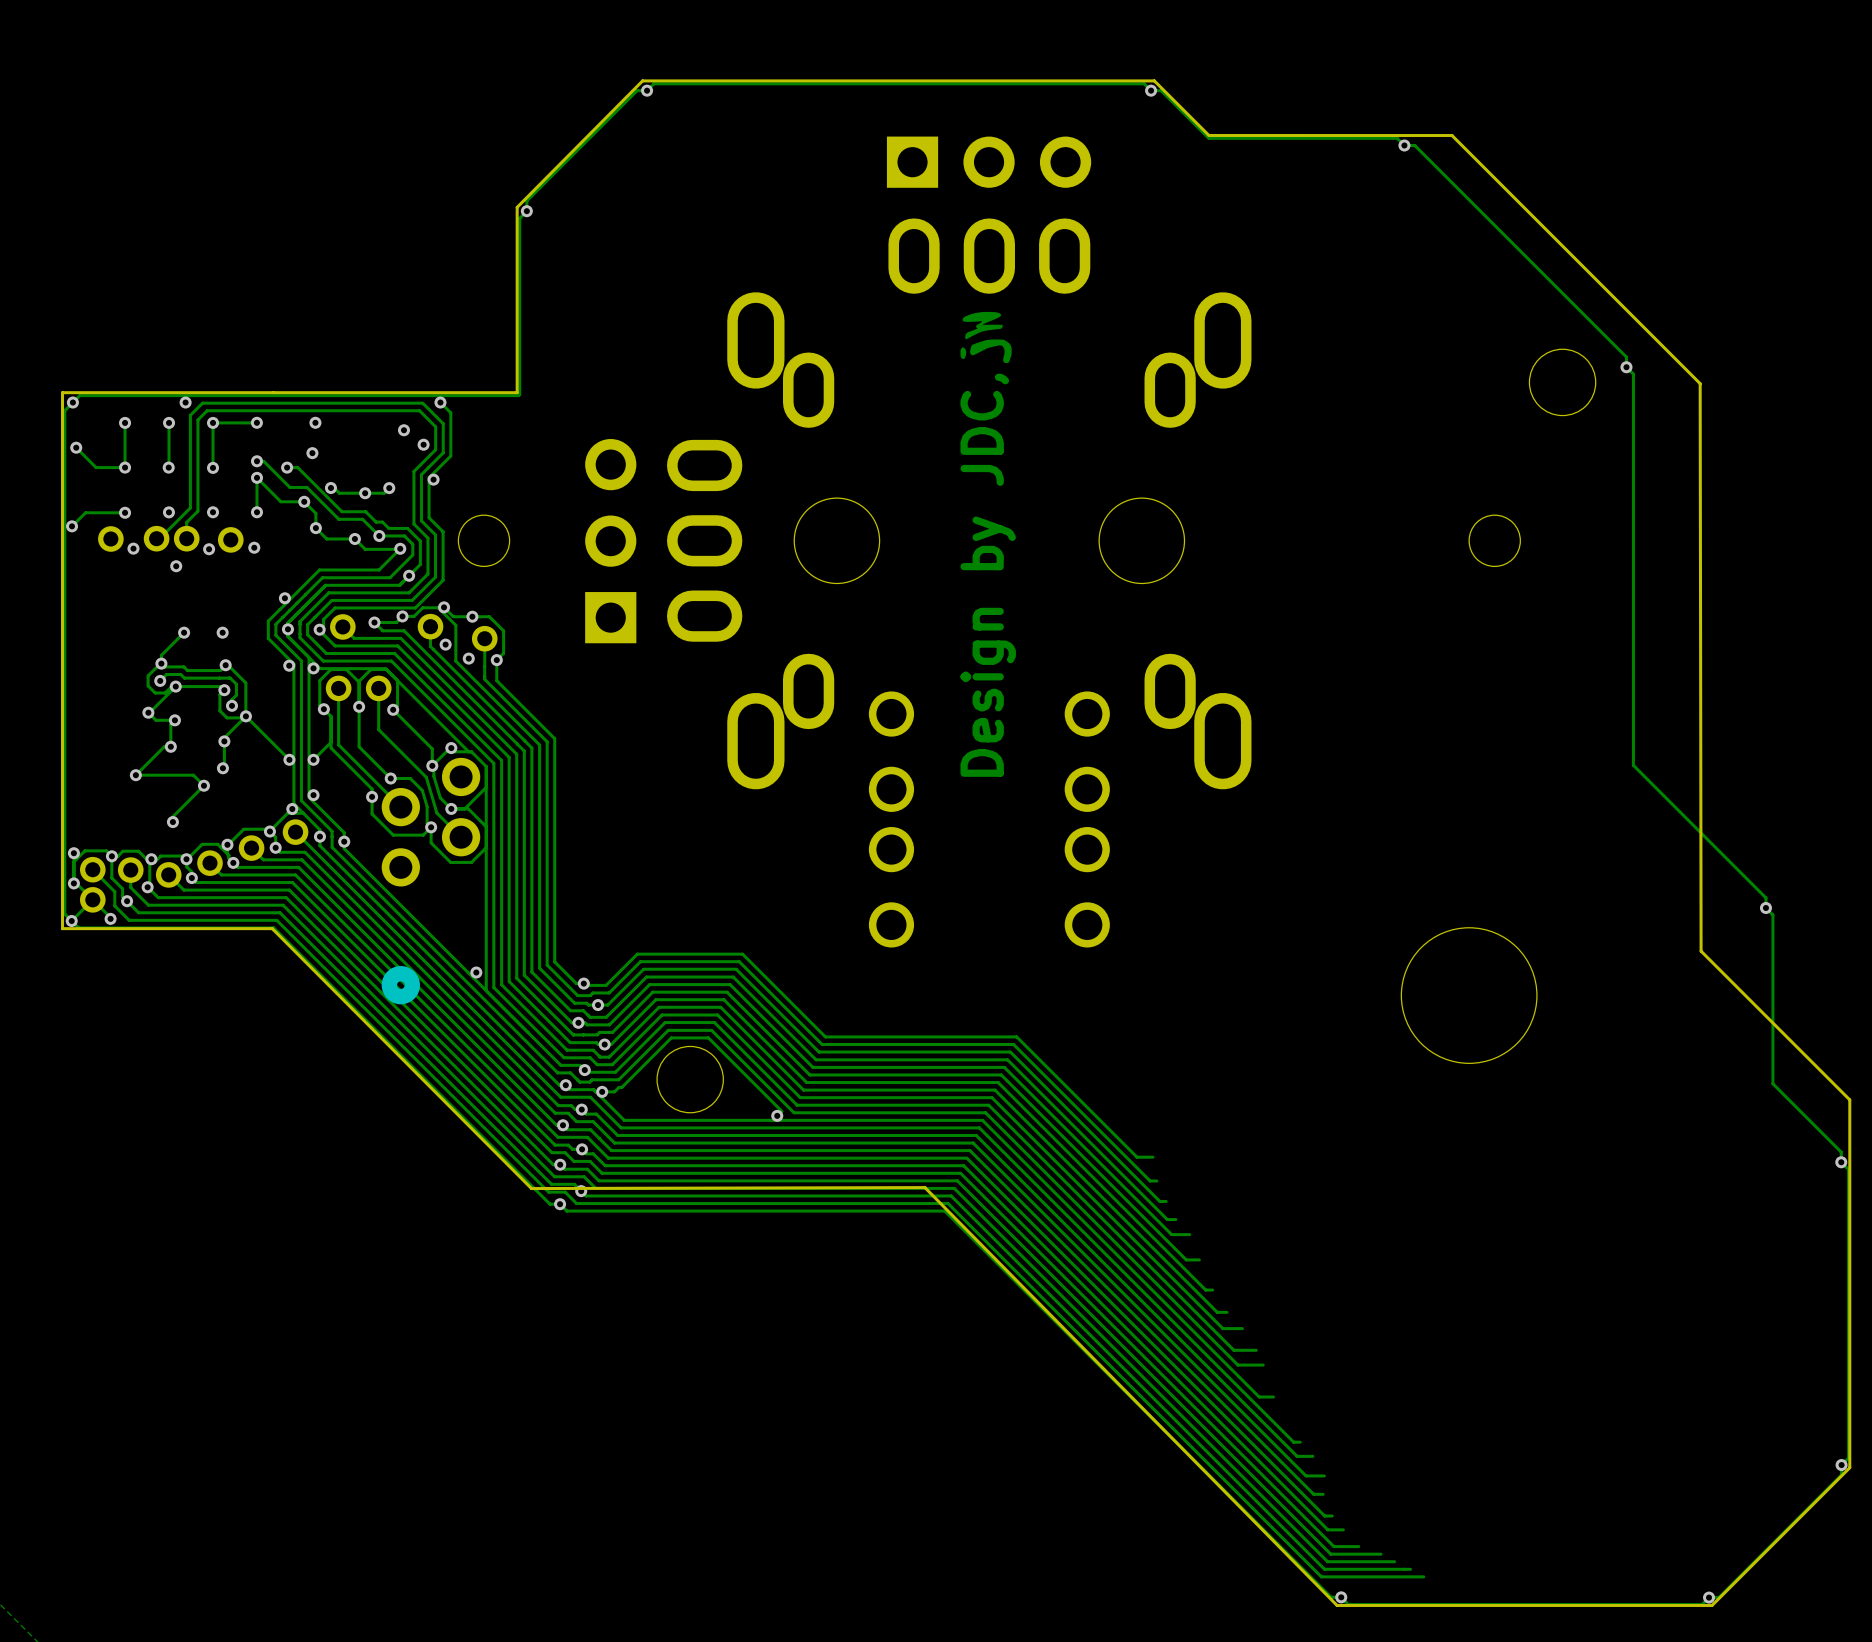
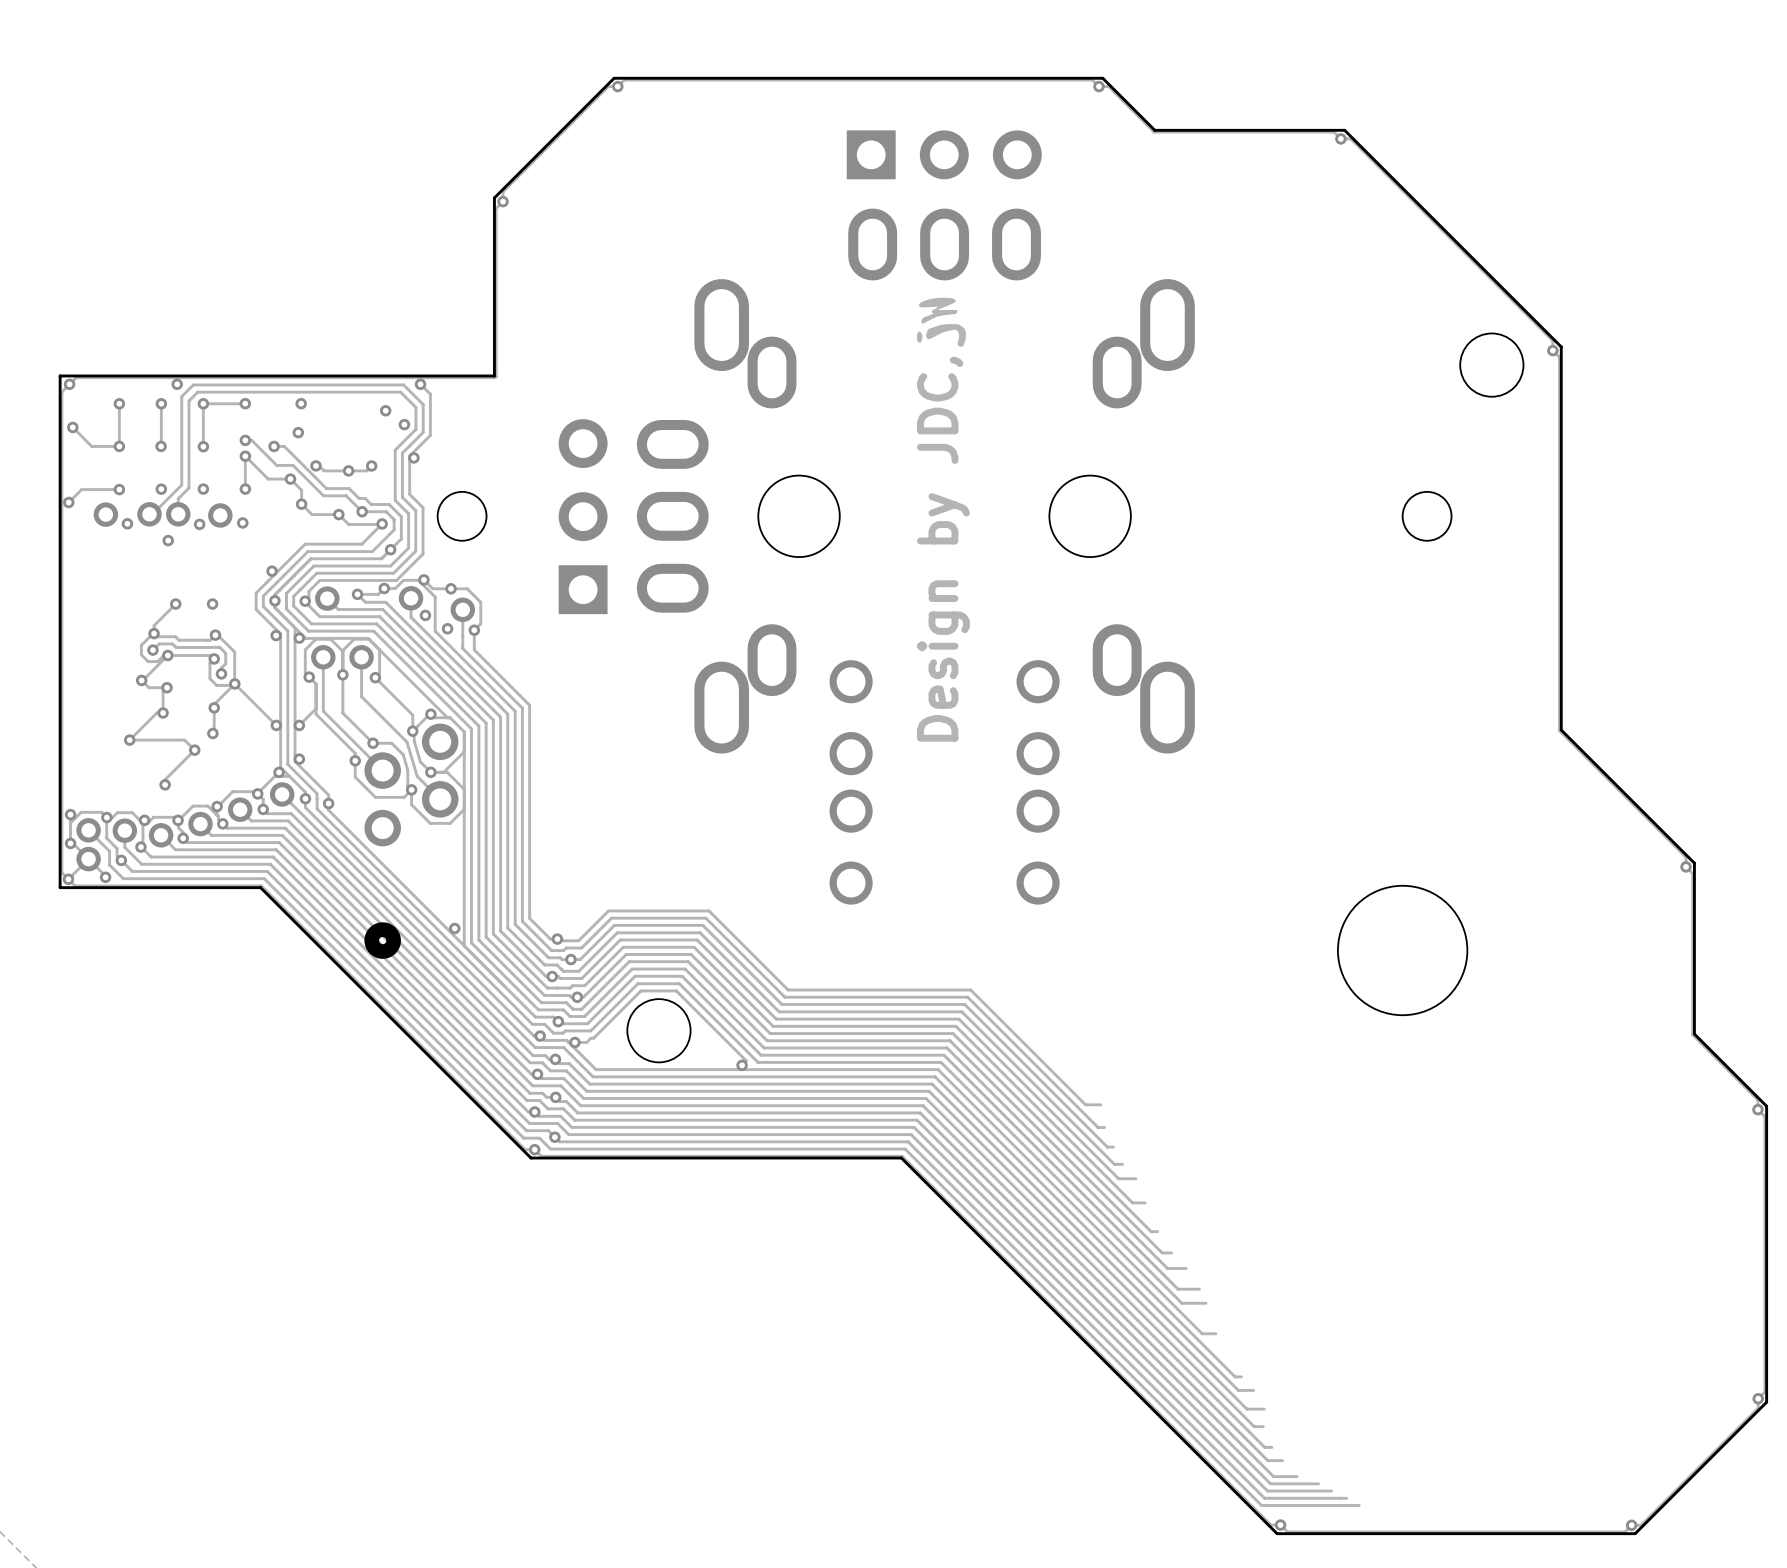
board edge: (1154, 80) (642, 80) (517, 207) (517, 392) (62, 392) (62, 928) (272, 928) (531, 1188) (924, 1187) (1337, 1605) (1712, 1605) (1849, 1467) (1849, 1099) (1701, 951) (1700, 383) (1452, 135) (1209, 135) (1154, 80) -> (1102, 78) (1154, 130) (1344, 130) (1561, 346) (1561, 730) (1694, 863) (1694, 1034) (1766, 1106) (1766, 1402) (1635, 1533) (1277, 1533) (901, 1158) (530, 1158) (260, 887) (60, 887) (60, 375) (494, 375) (494, 197) (614, 78) (1102, 78)

